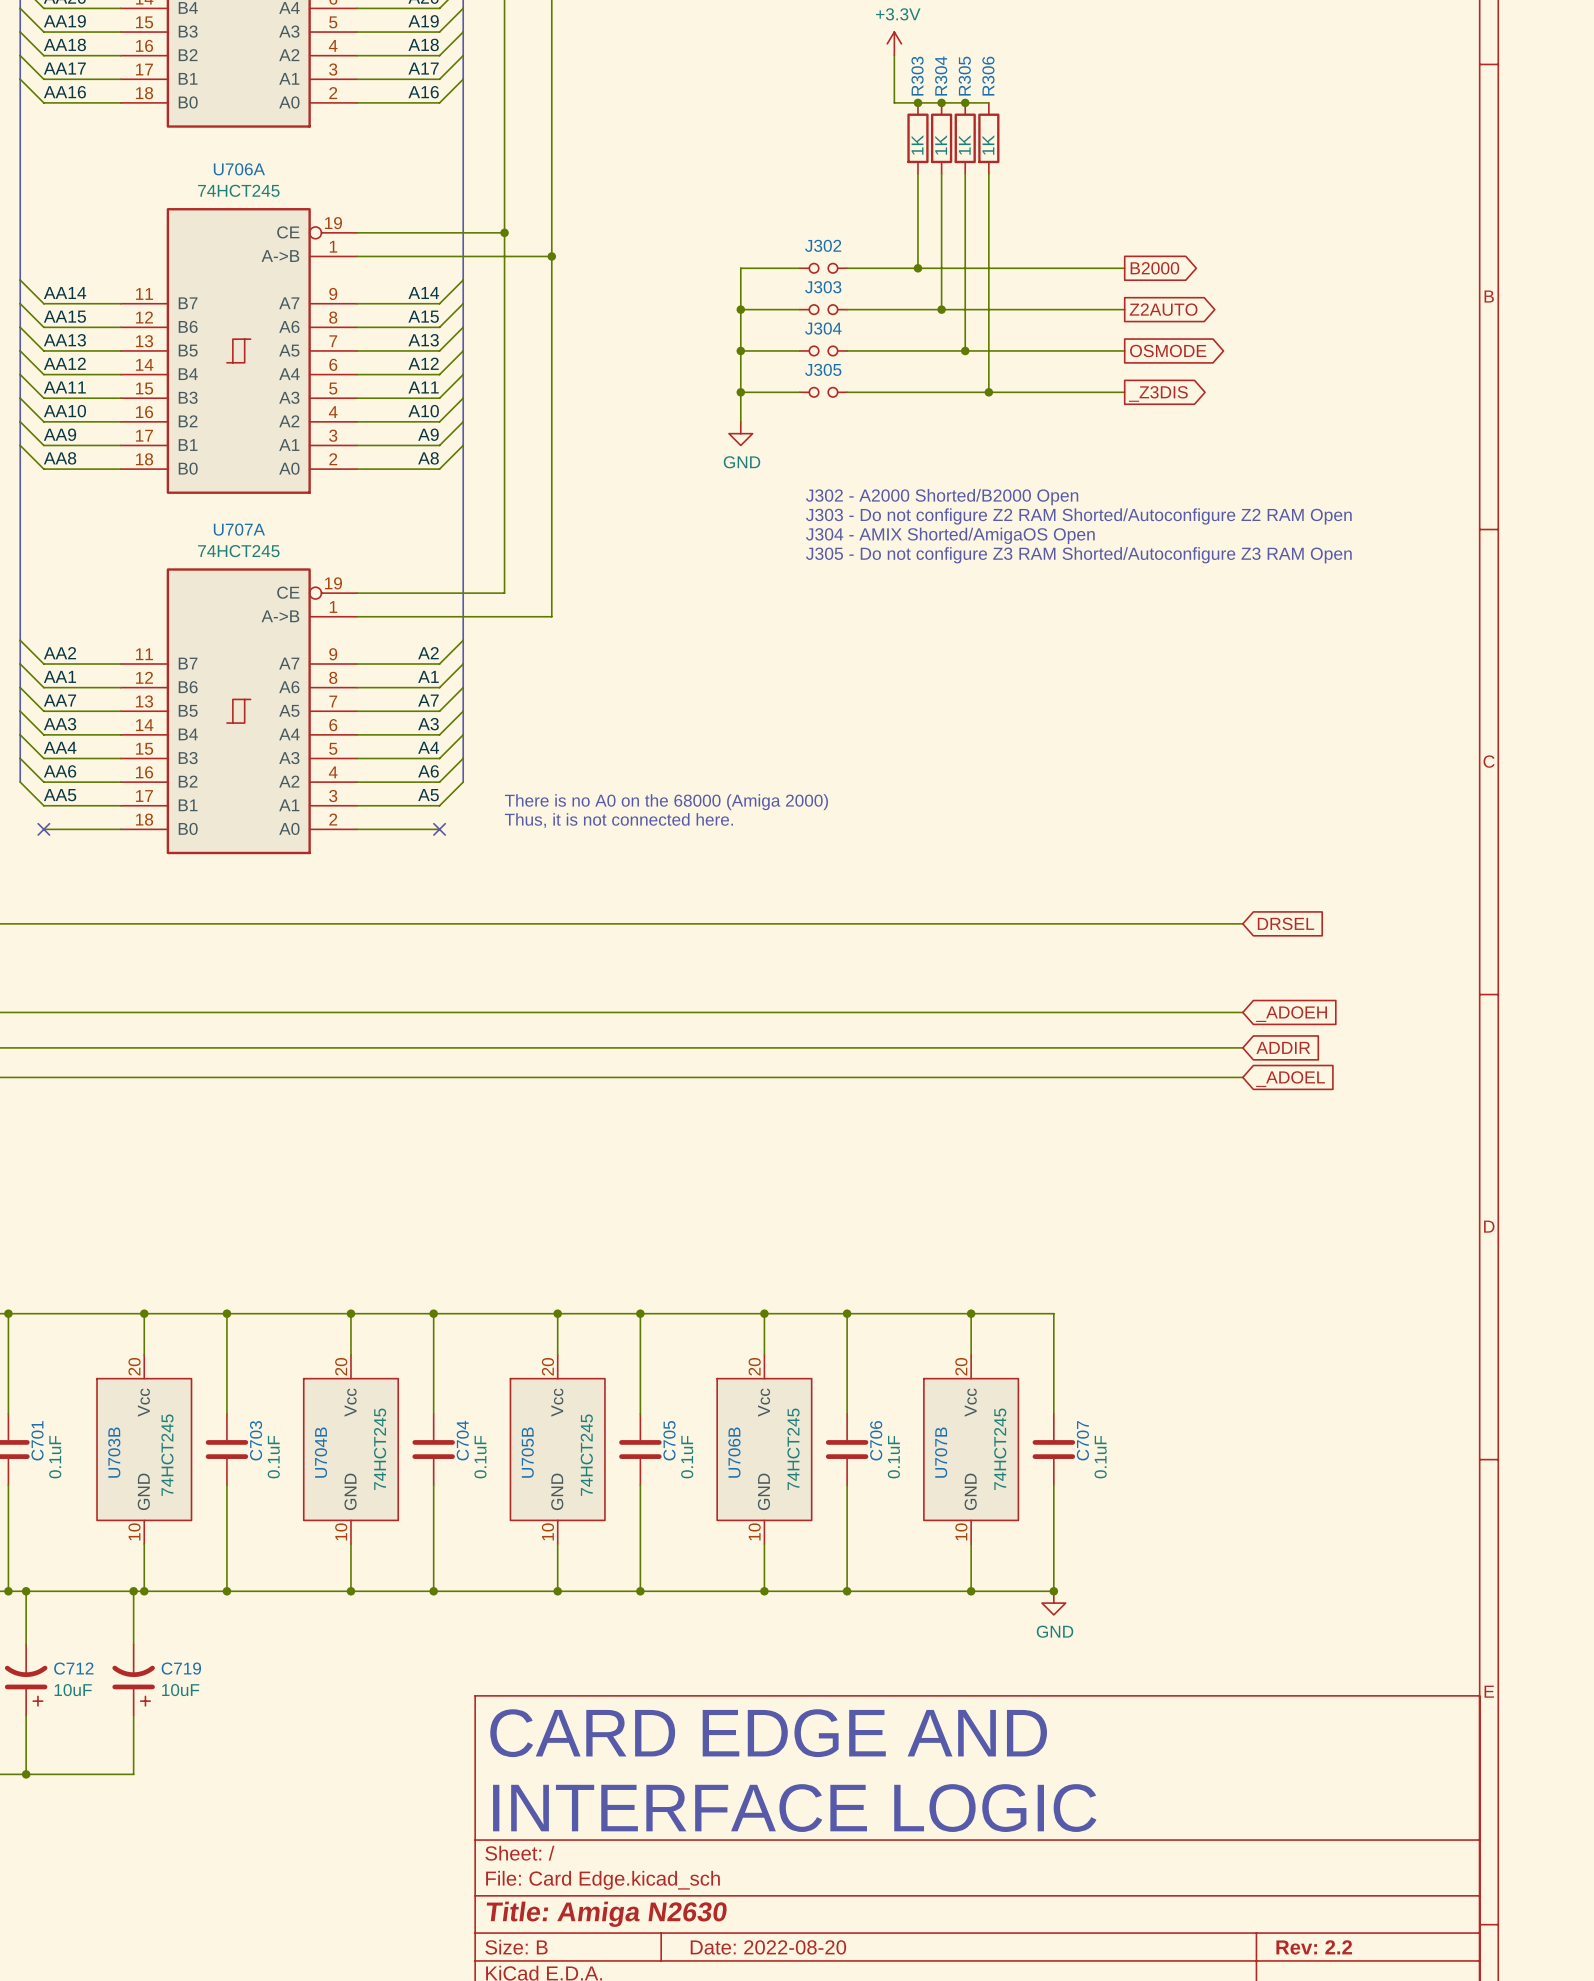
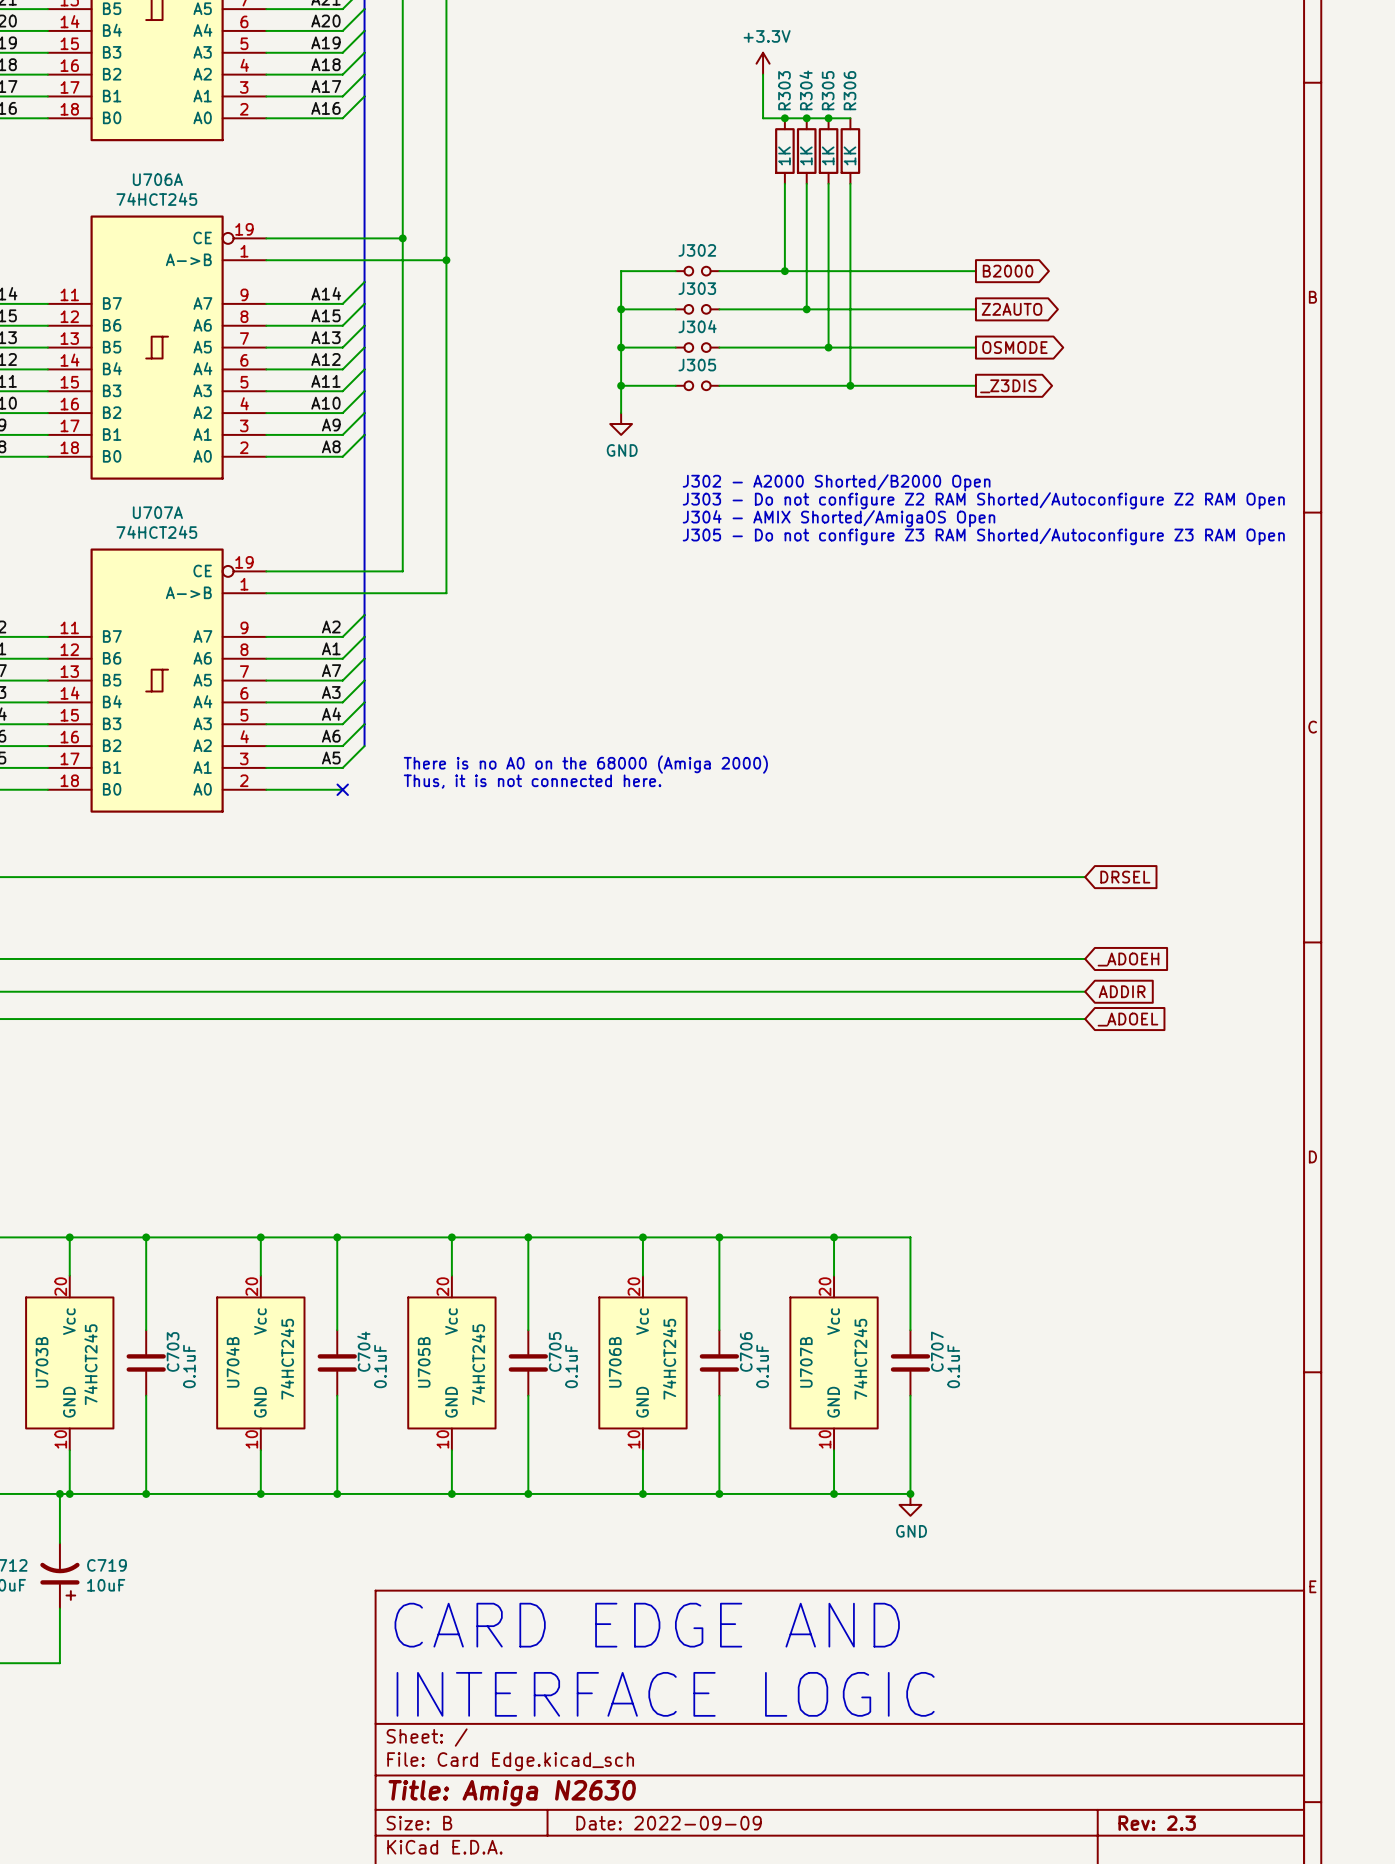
title block: Date: 2022-08-20 (768, 1947) -> Date: 2022-09-09 (669, 1823)
title block: Rev: 2.2 (1314, 1947) -> Rev: 2.3 (1157, 1823)

